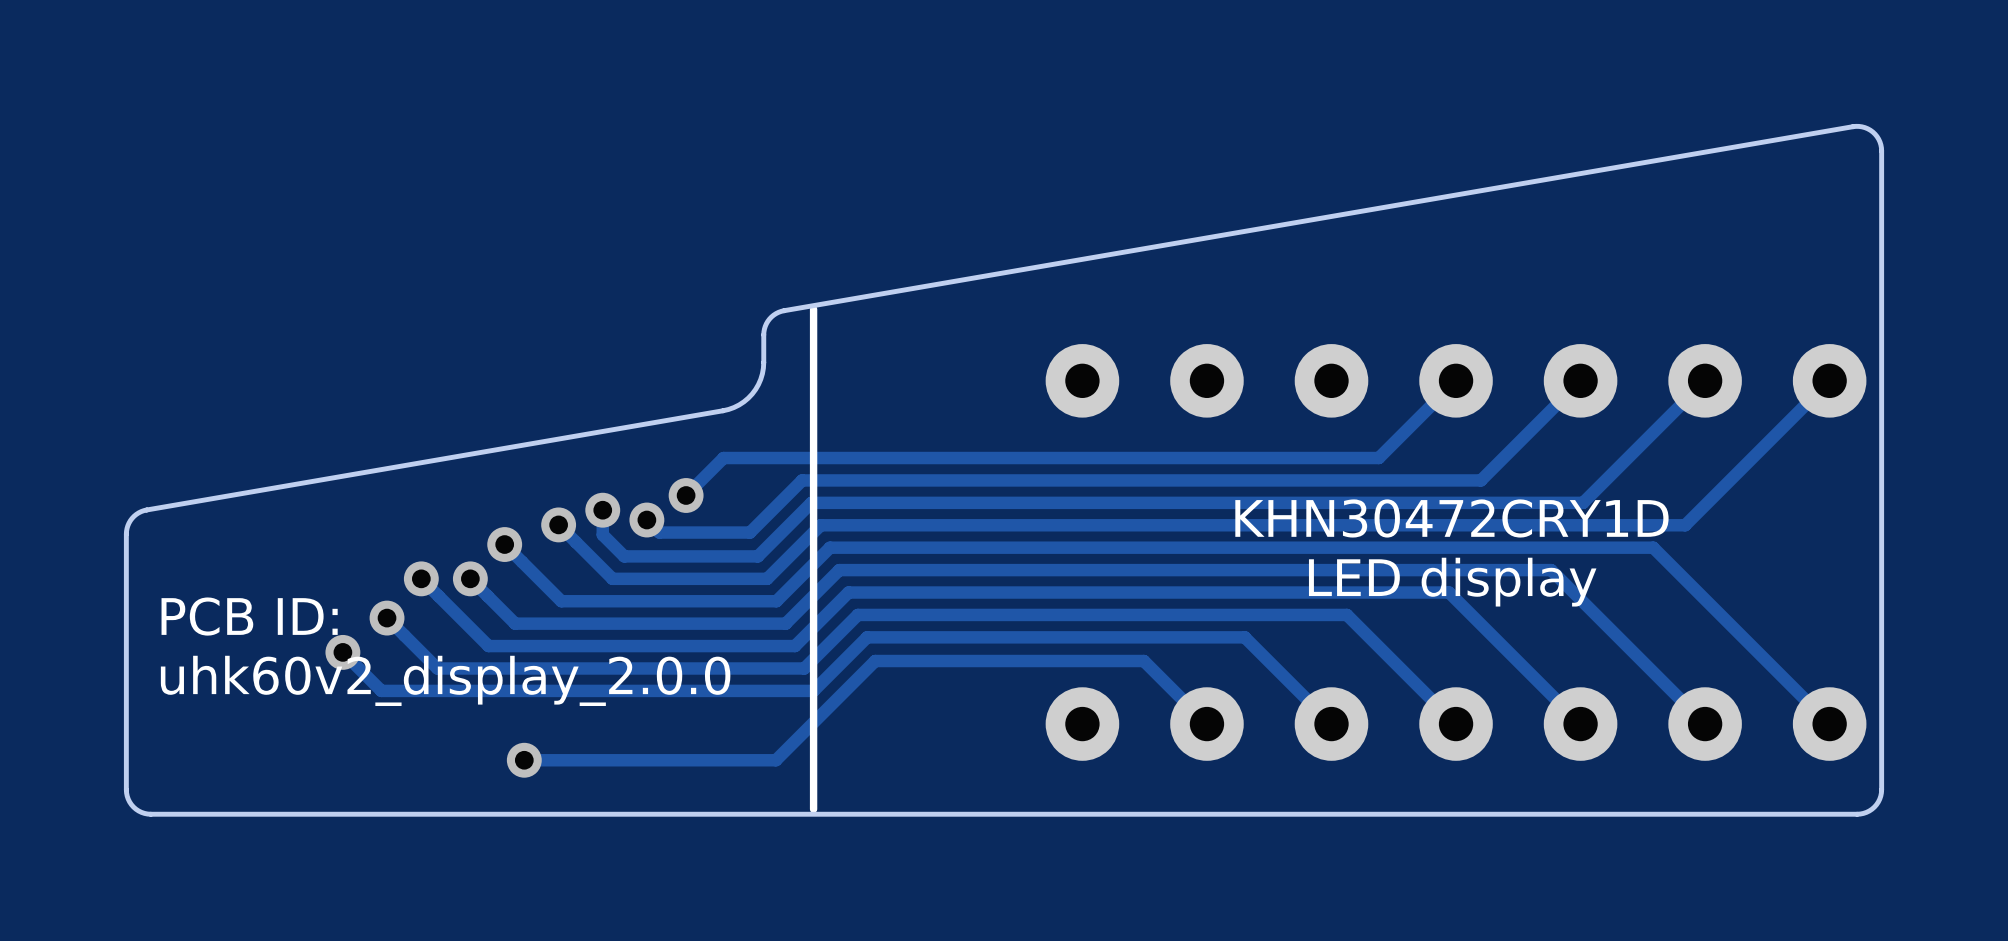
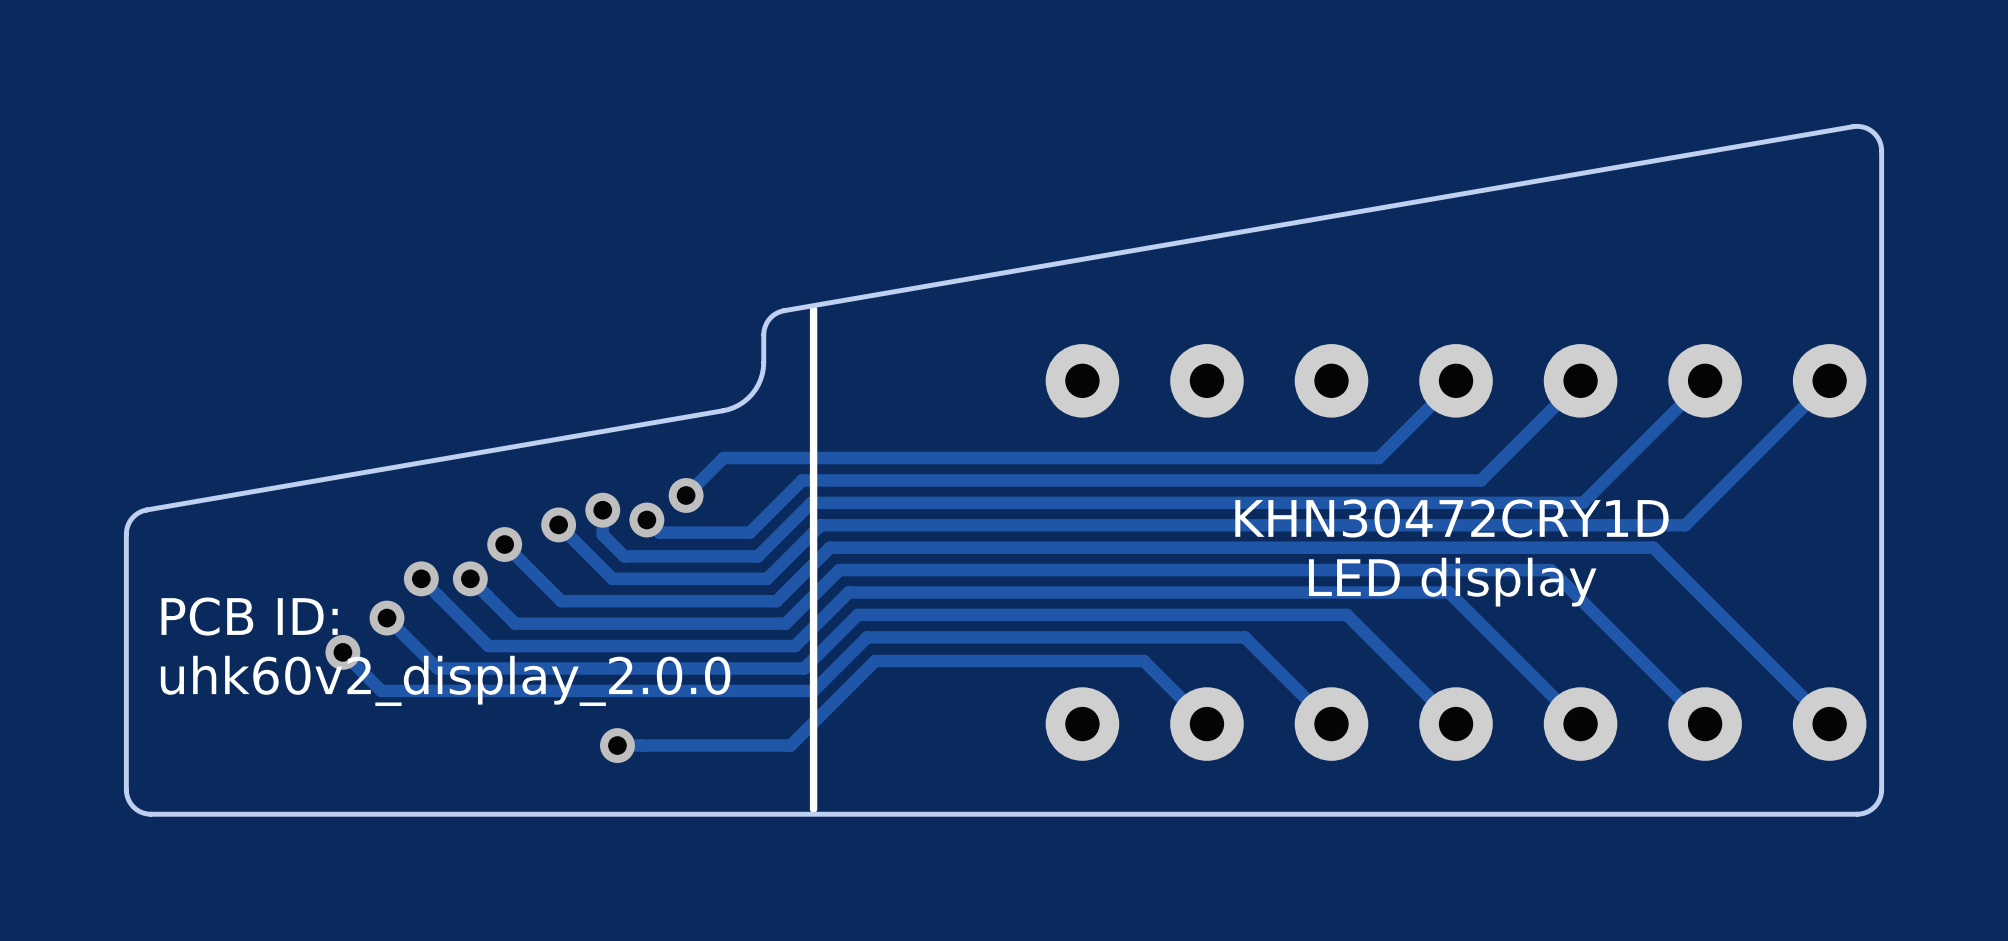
track: (790, 745) (775, 760) (524, 760) -> (790, 745) (617, 745)
via position: (524, 760) -> (617, 745)

